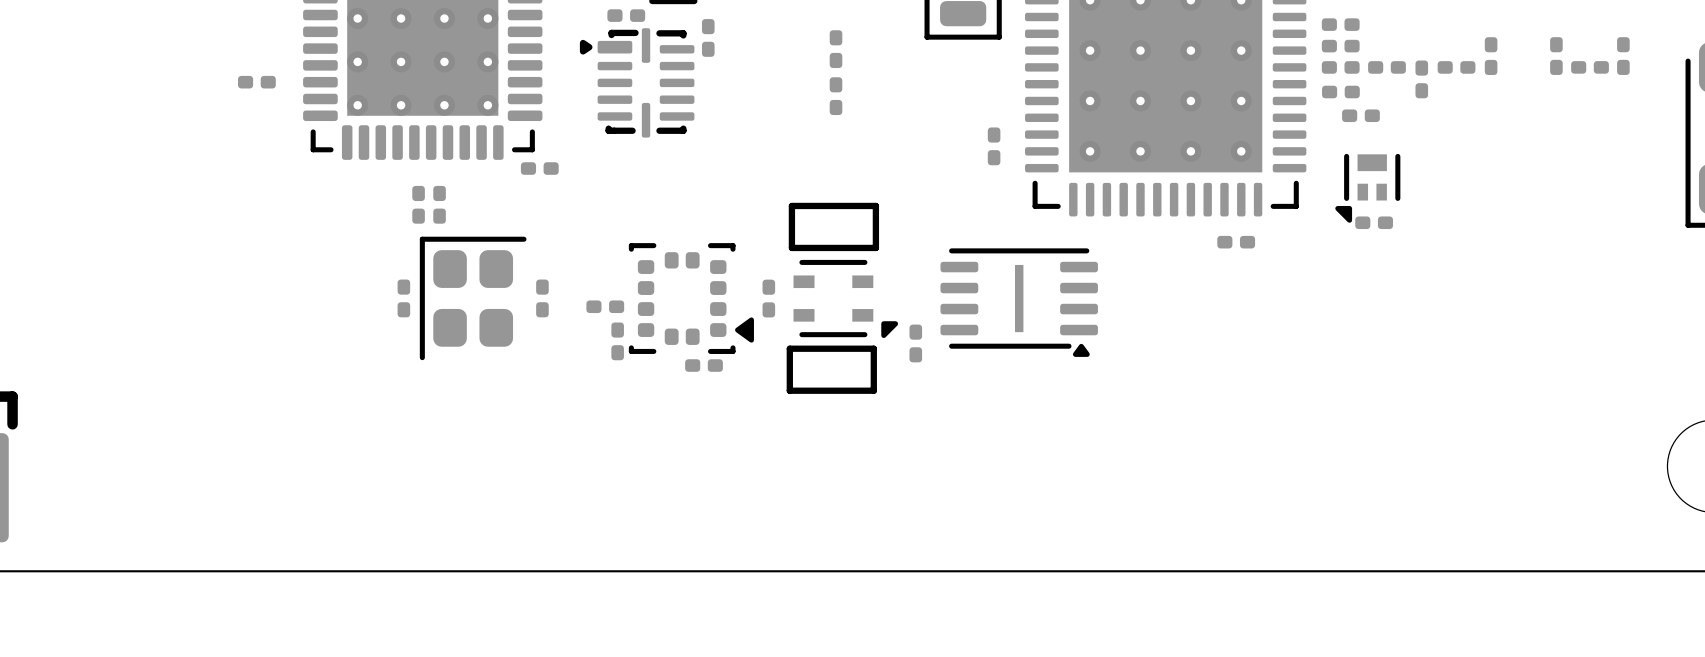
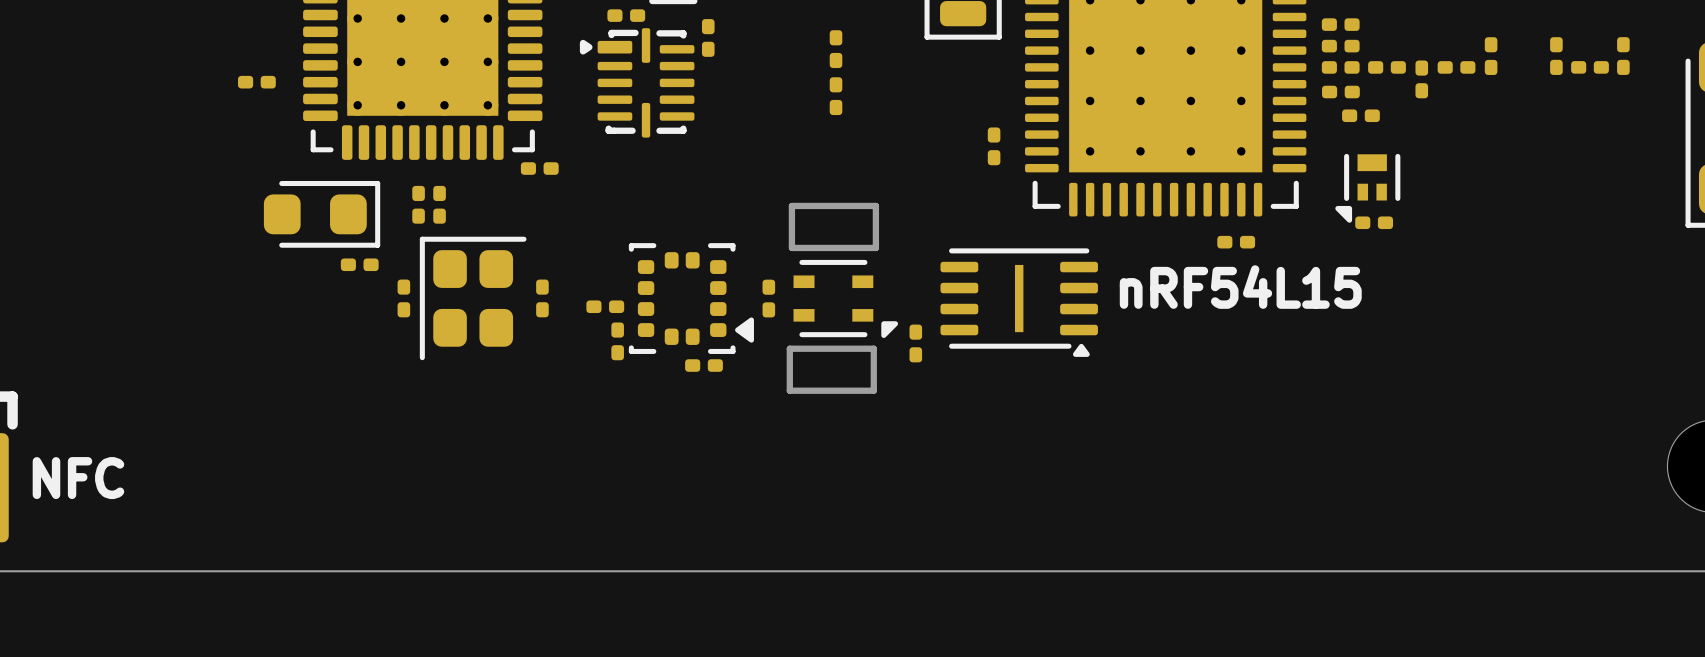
part: none -> (322, 214)
part: none -> (359, 264)
text: none -> nRF54L15 (1240, 287)
text: none -> NFC (78, 478)

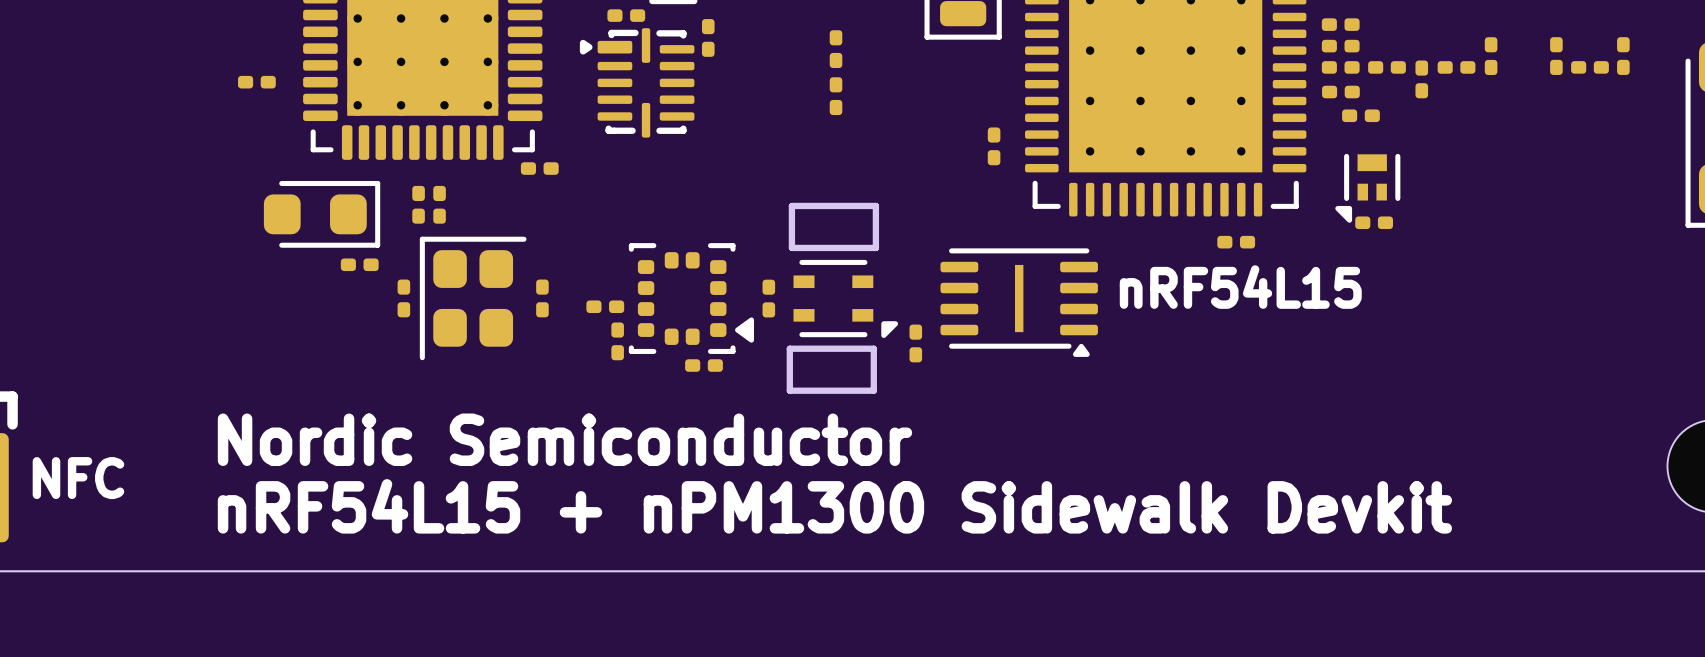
text: none -> Nordic Semiconductor (564, 439)
text: none -> nRF54L15 + nPM1300 Sidewalk Devkit (834, 506)

